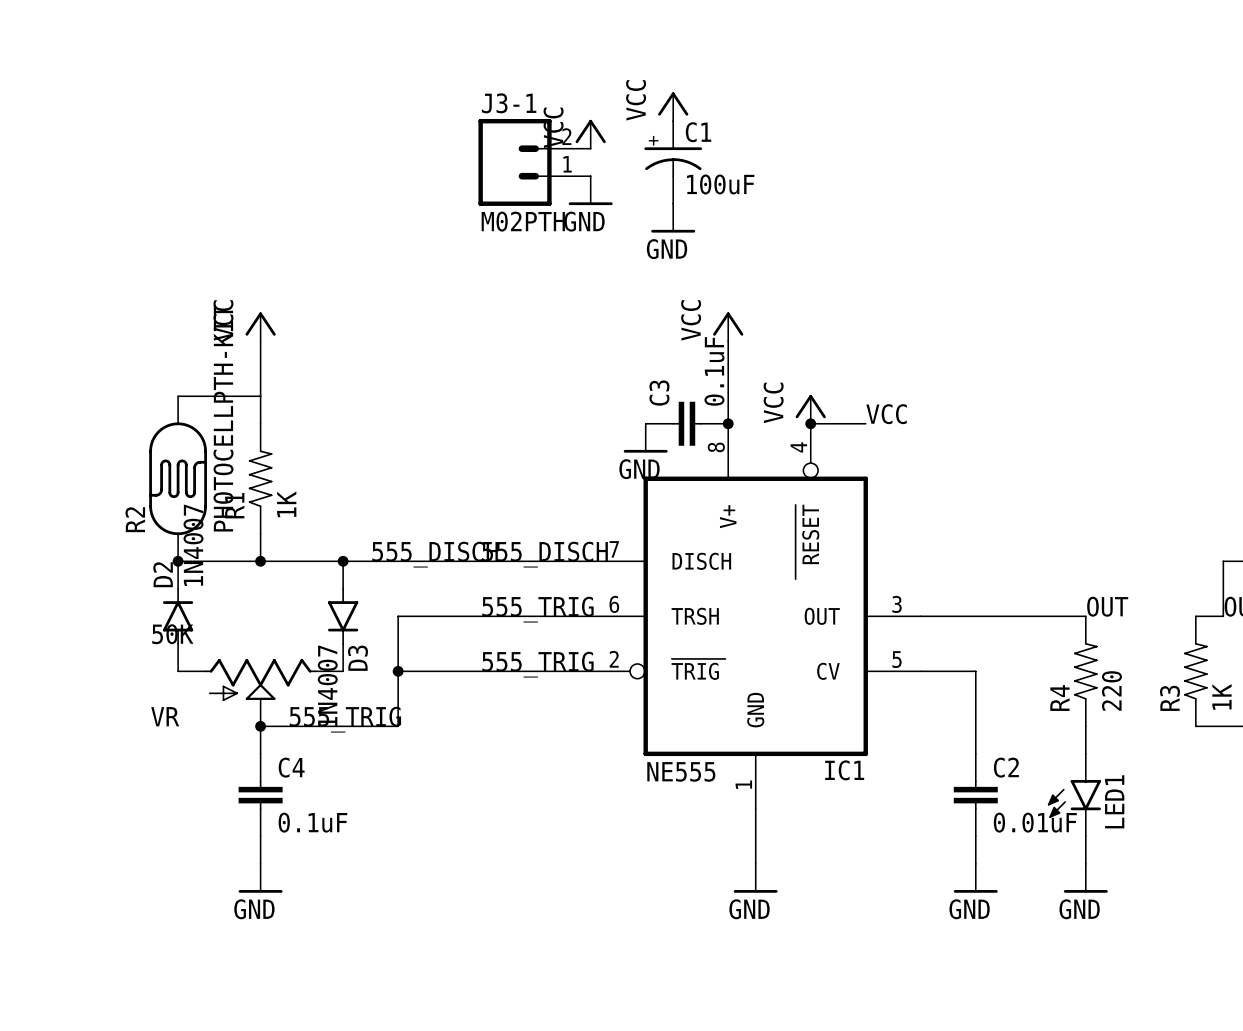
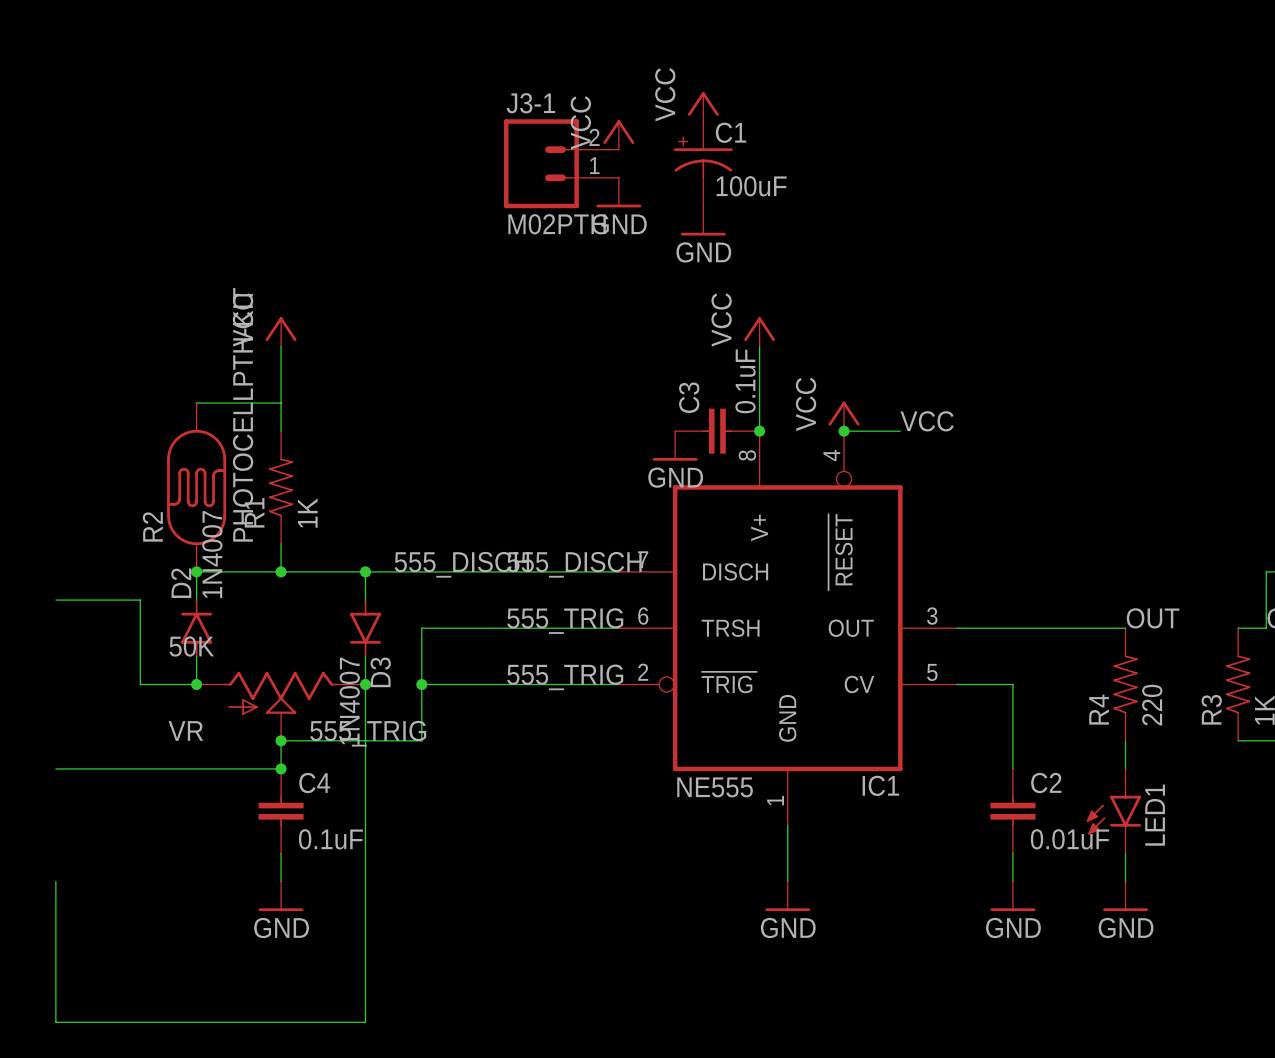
wire: none -> (55, 600) (140, 600) (140, 684) (196, 684)
junction: none -> (196, 684)
wire: none -> (365, 684) (365, 1022) (55, 1022) (55, 881)
junction: none -> (365, 684)
wire: none -> (55, 768) (281, 768)
junction: none -> (281, 768)

